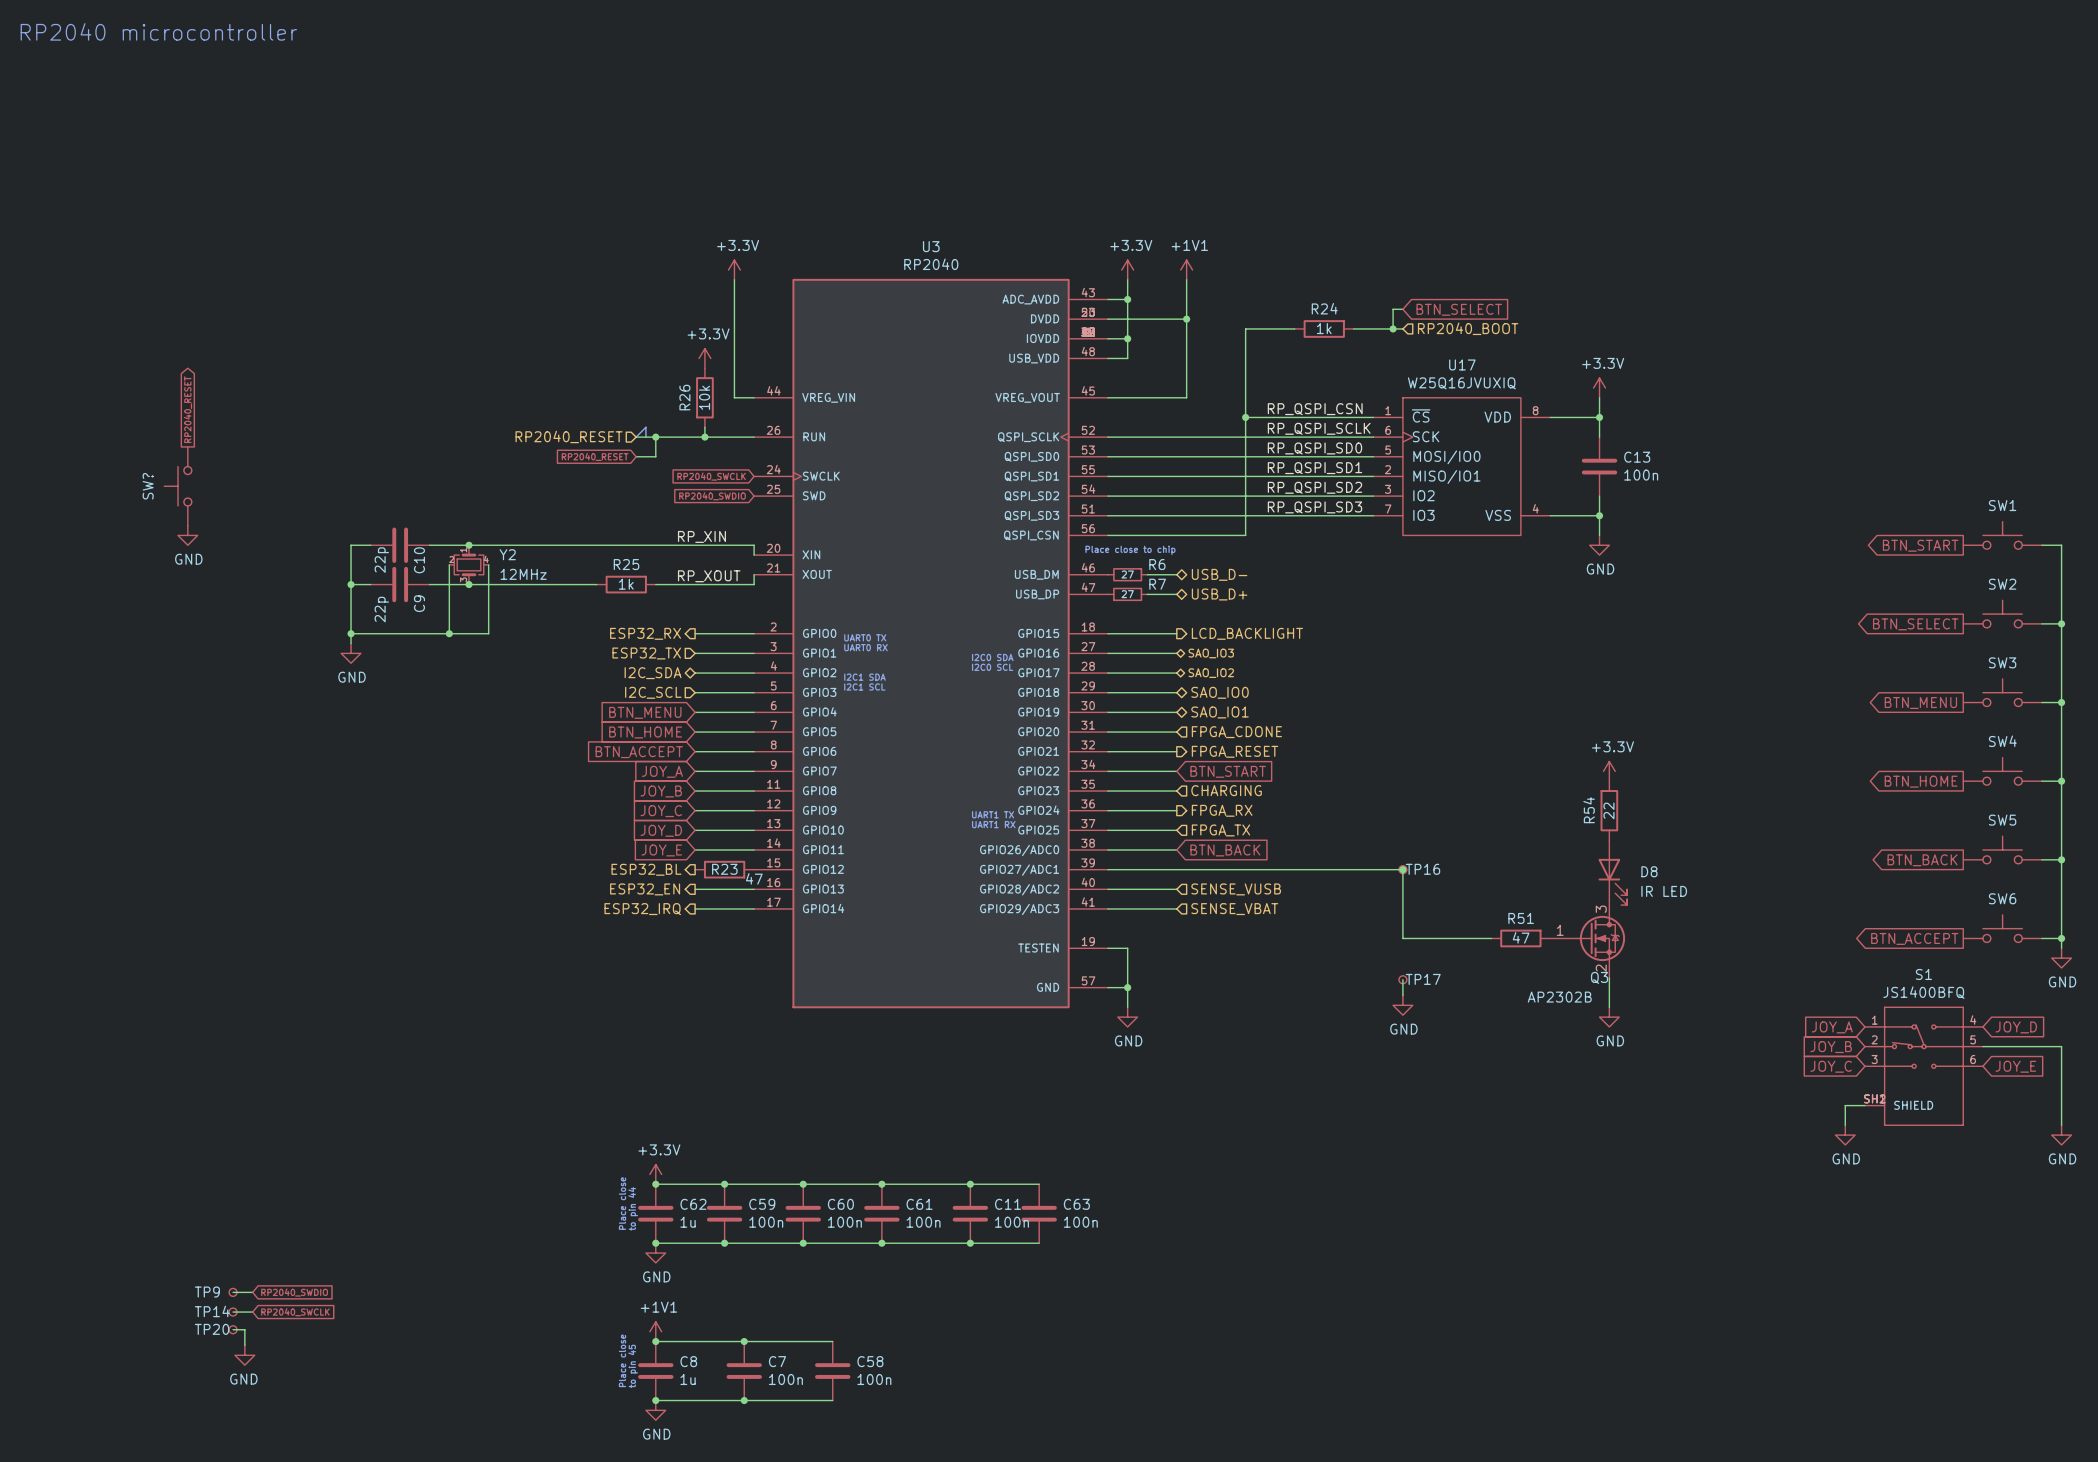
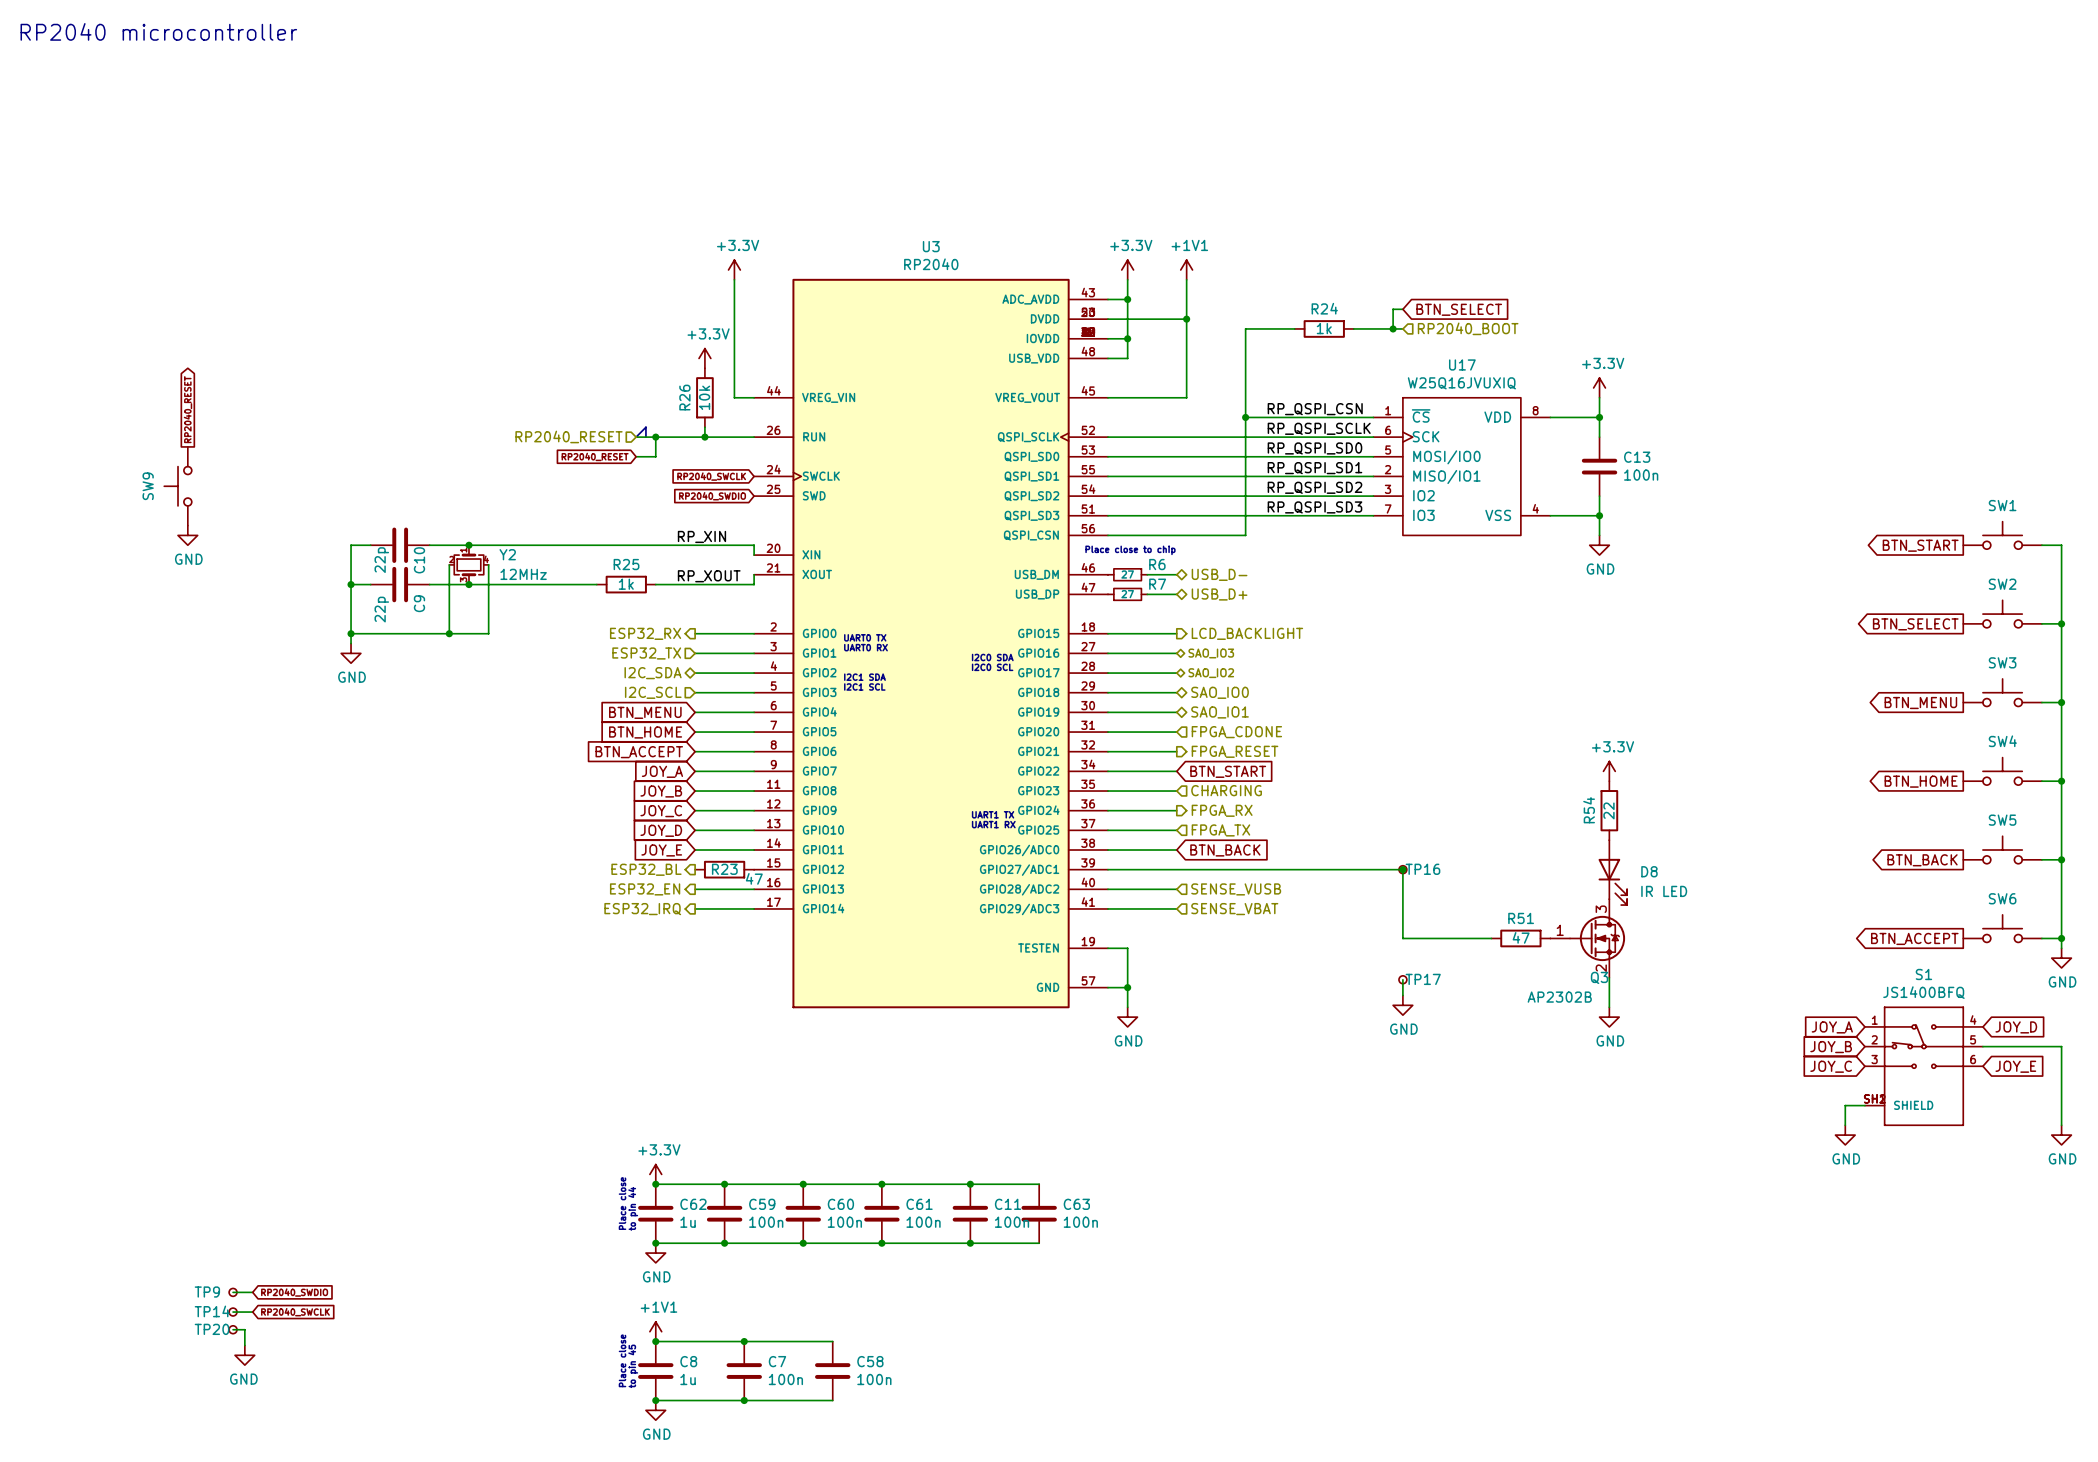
SW? name: SW? (148, 486) -> SW9 (148, 486)

